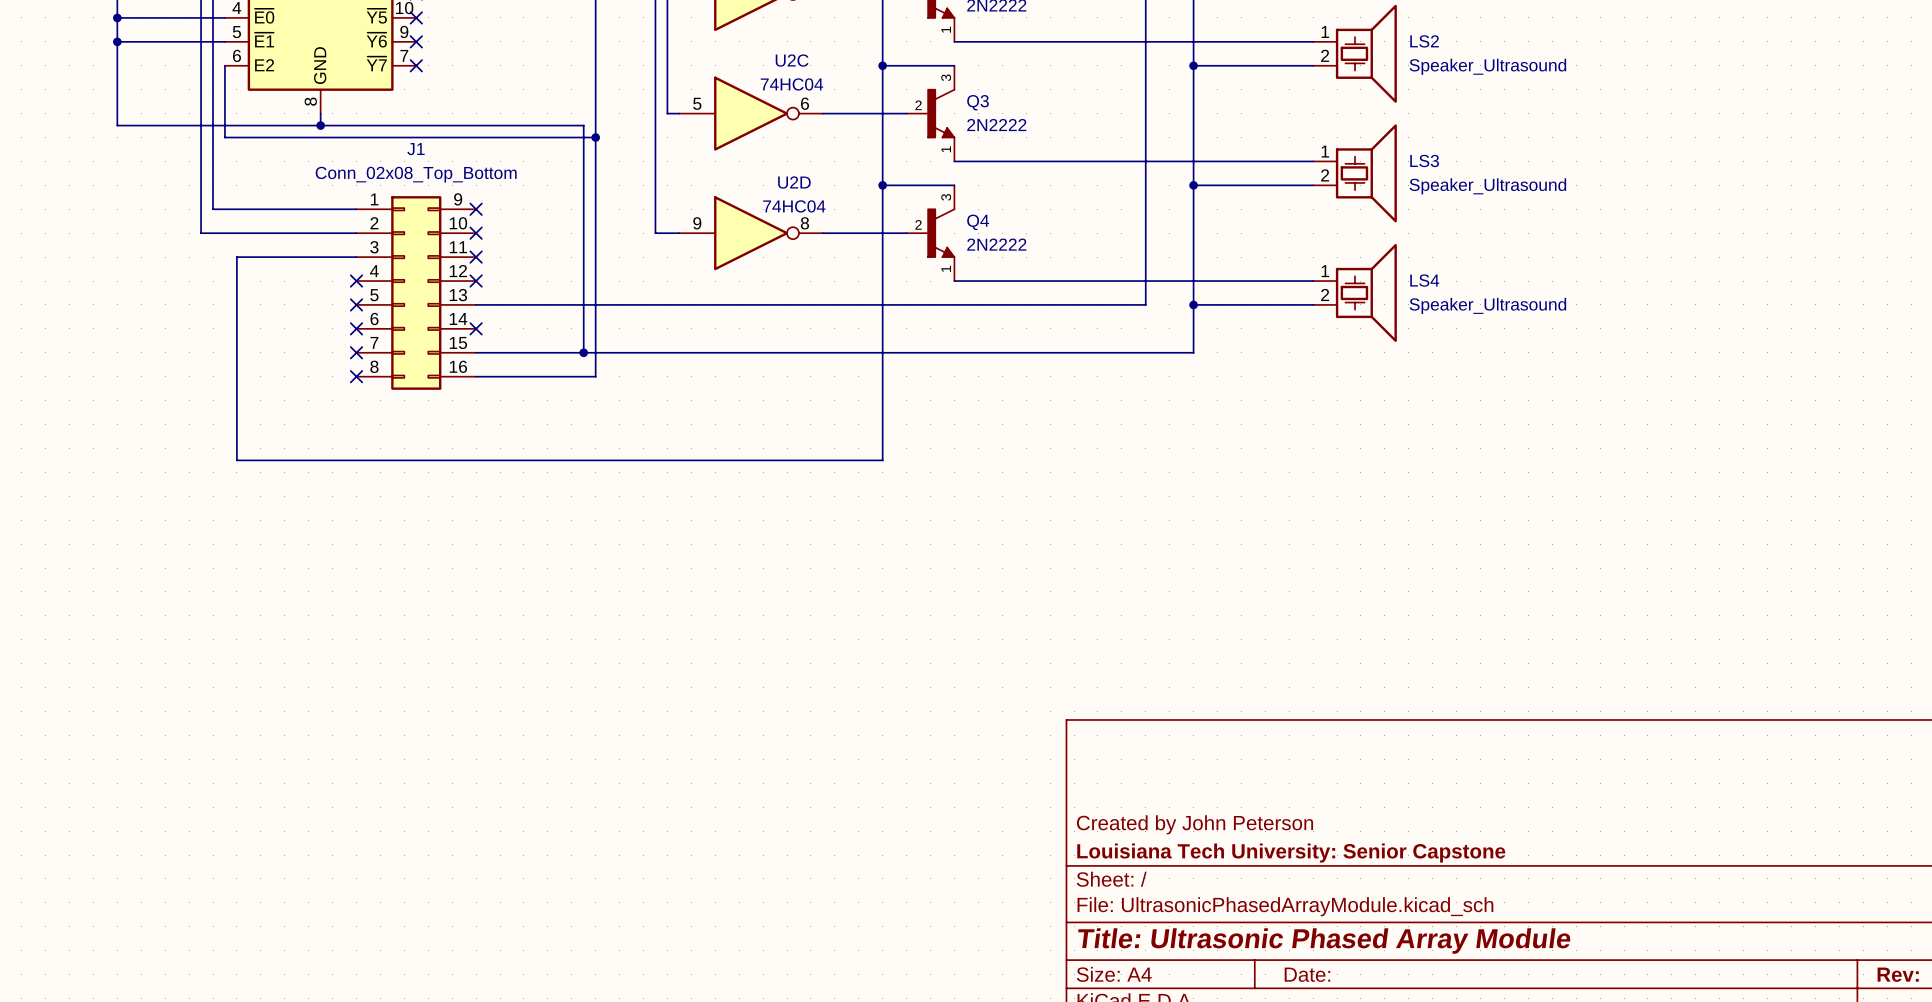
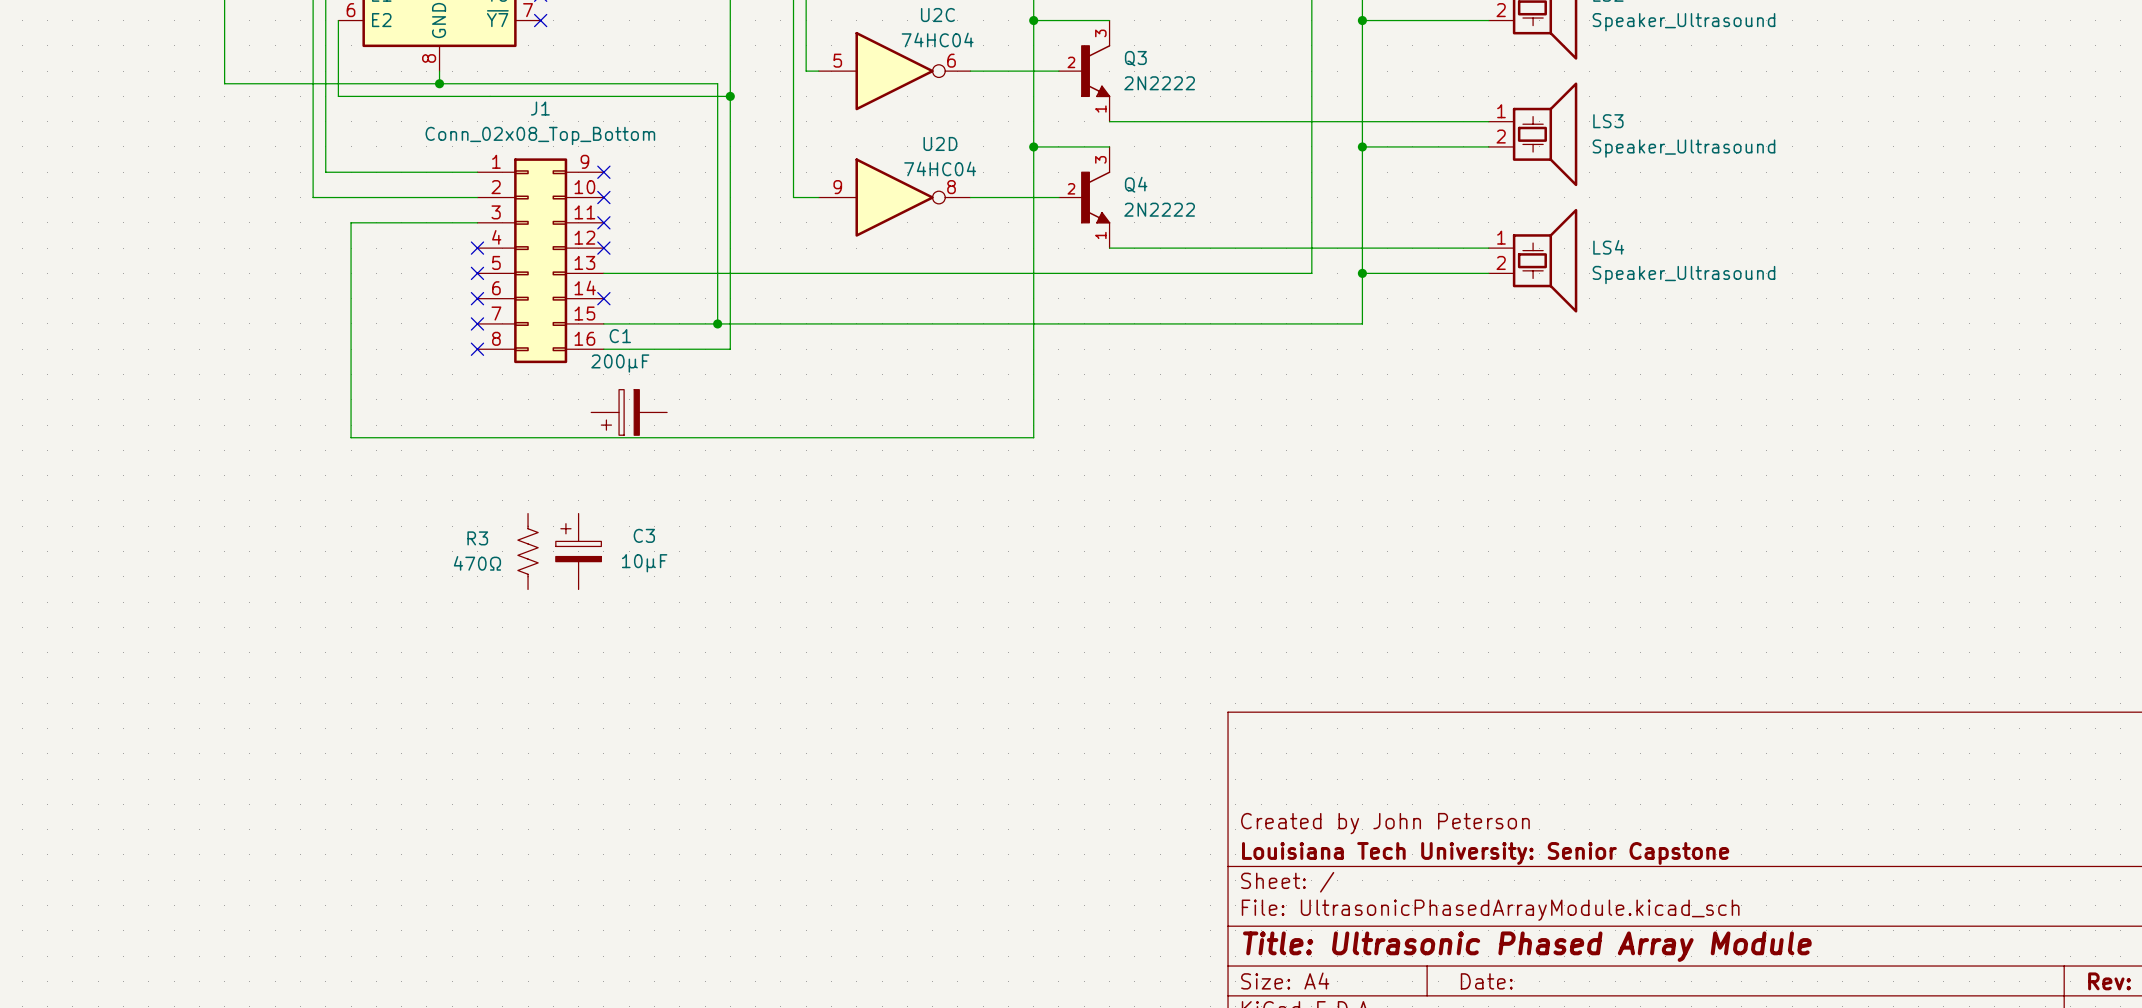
C1: none -> 200μF (629, 412)
R3: none -> 470Ω (528, 551)
C3: none -> 10μF (578, 551)

